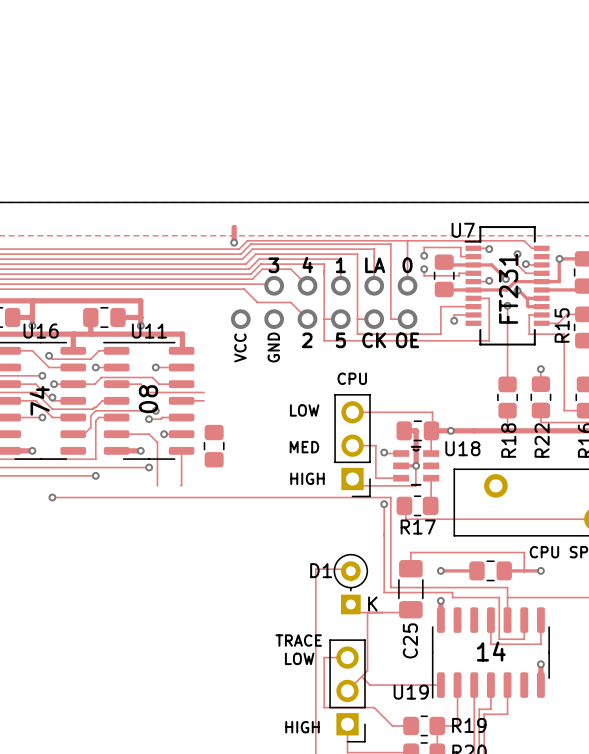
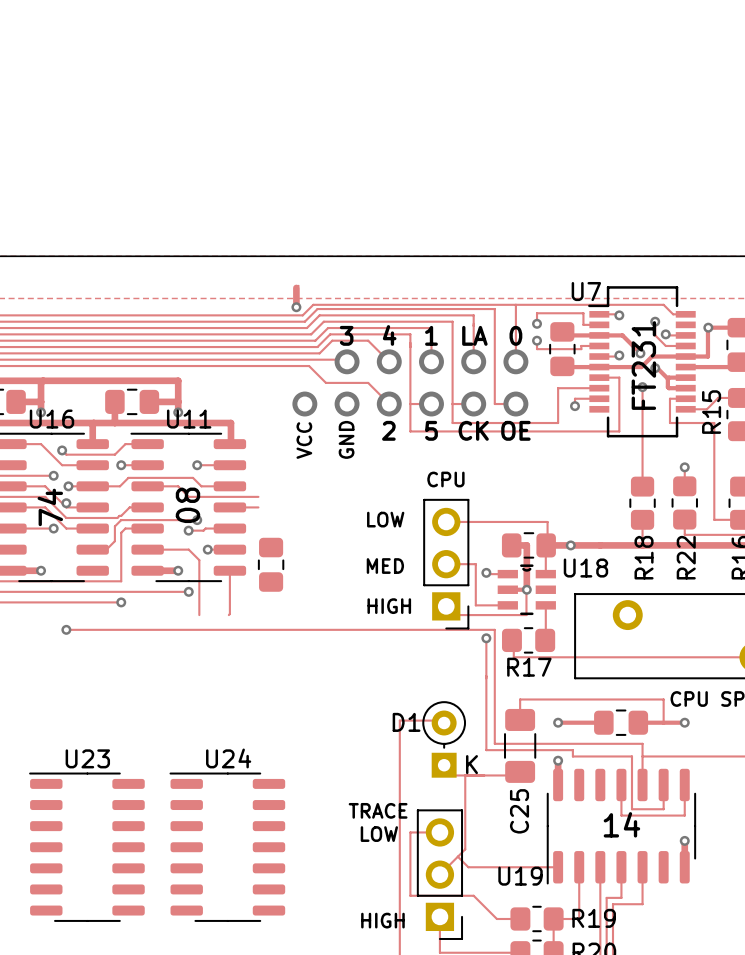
U23: none -> (86, 847)
U24: none -> (227, 847)

